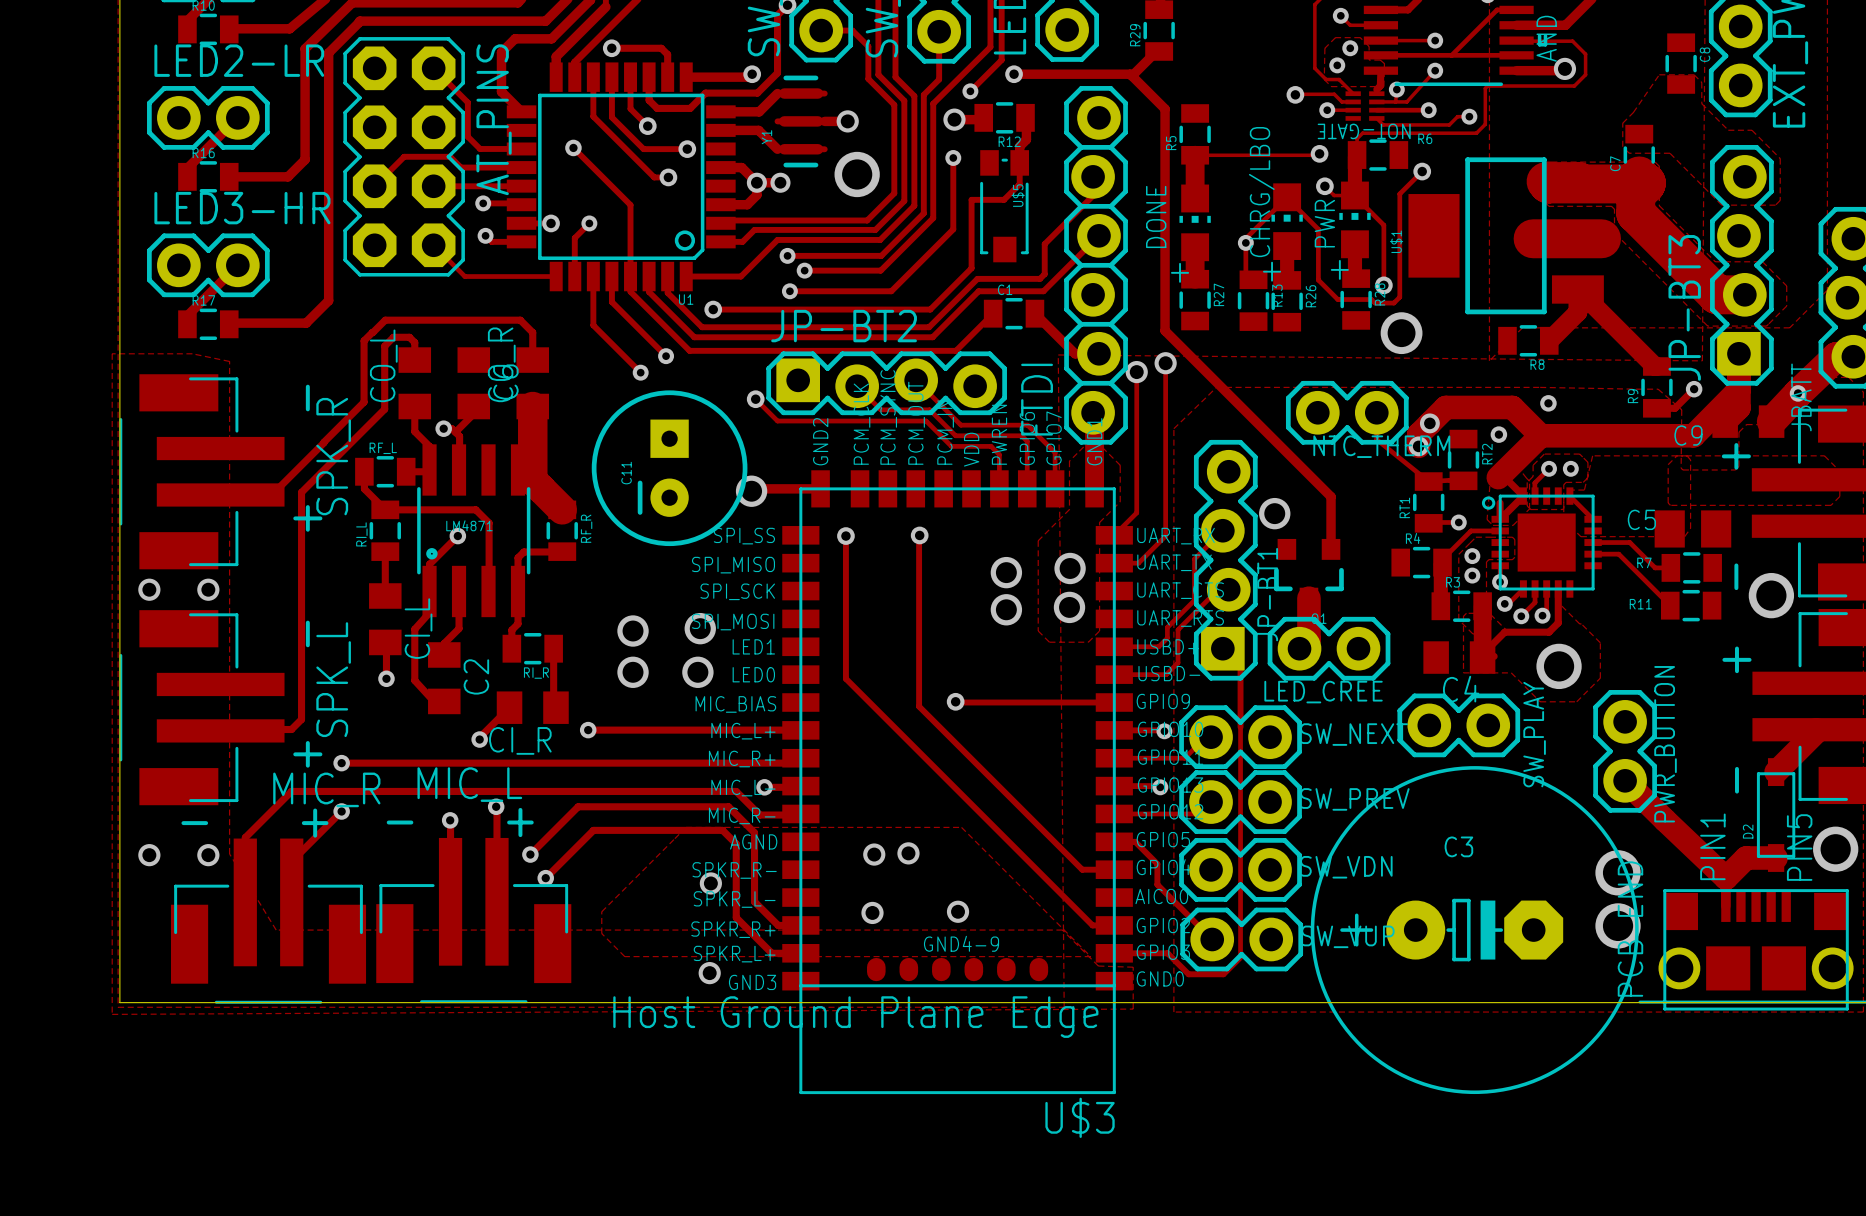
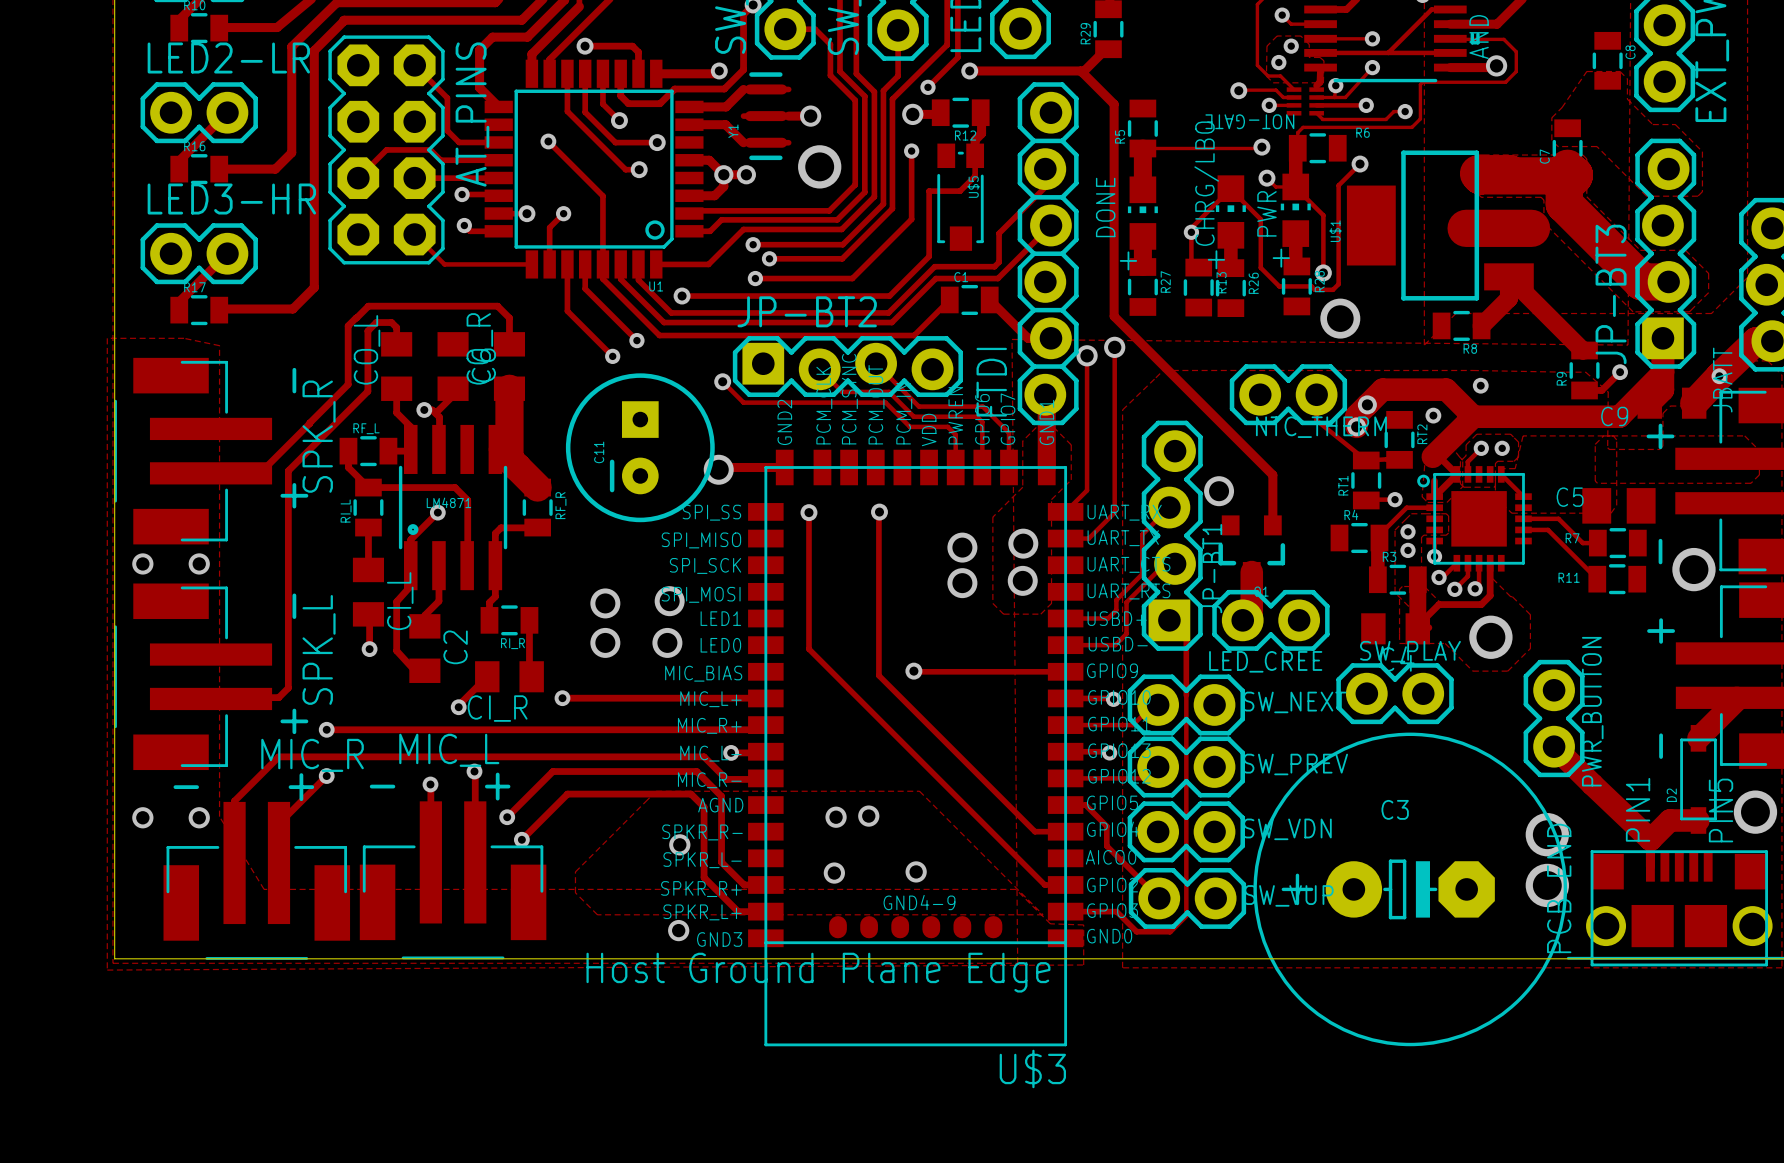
NOT-GATE name position: NOT-GATE (1364, 131) -> NOT-GATE (1249, 121)
SW_PLAY name rotation: 0° (1534, 734) -> 90° clockwise (1410, 651)

